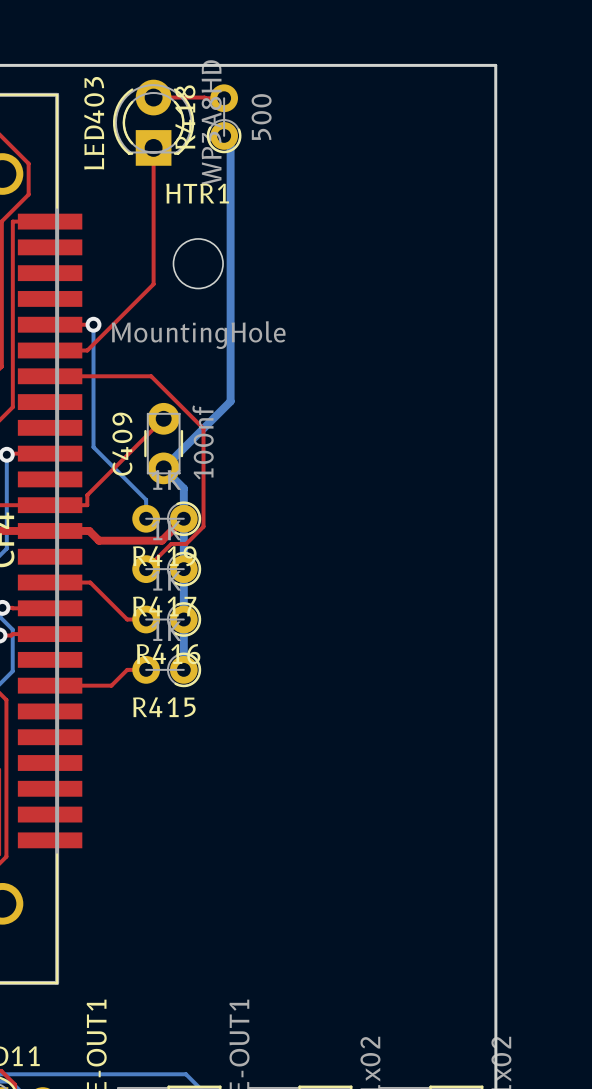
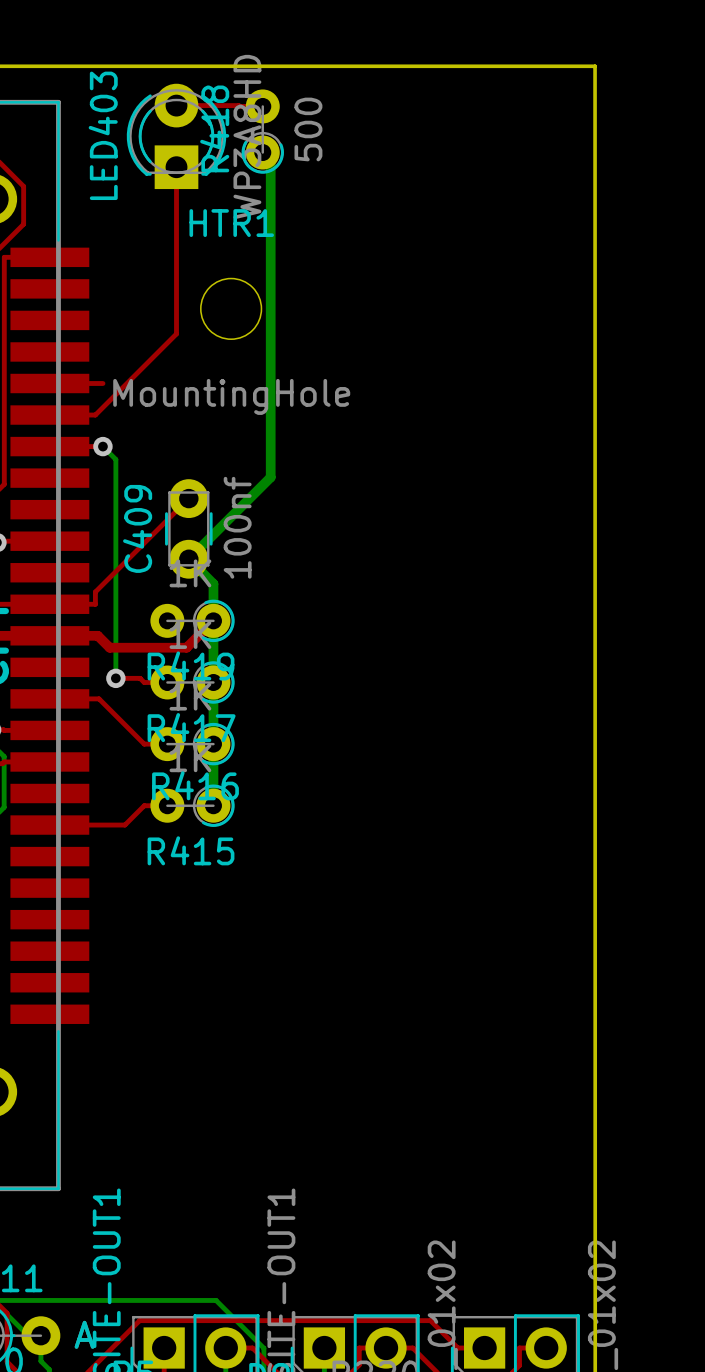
bottom track: (93, 324) (93, 447) (146, 499) (146, 518) -> none
via position: (93, 324) -> (102, 446)
top track: (93, 376) (151, 376) (203, 428) (203, 526) (186, 543) (171, 543) (146, 569) -> (115, 678) (140, 678) (144, 682) (167, 682)
bottom track: none -> (102, 446) (115, 459) (115, 678)
via: none -> (115, 678)

